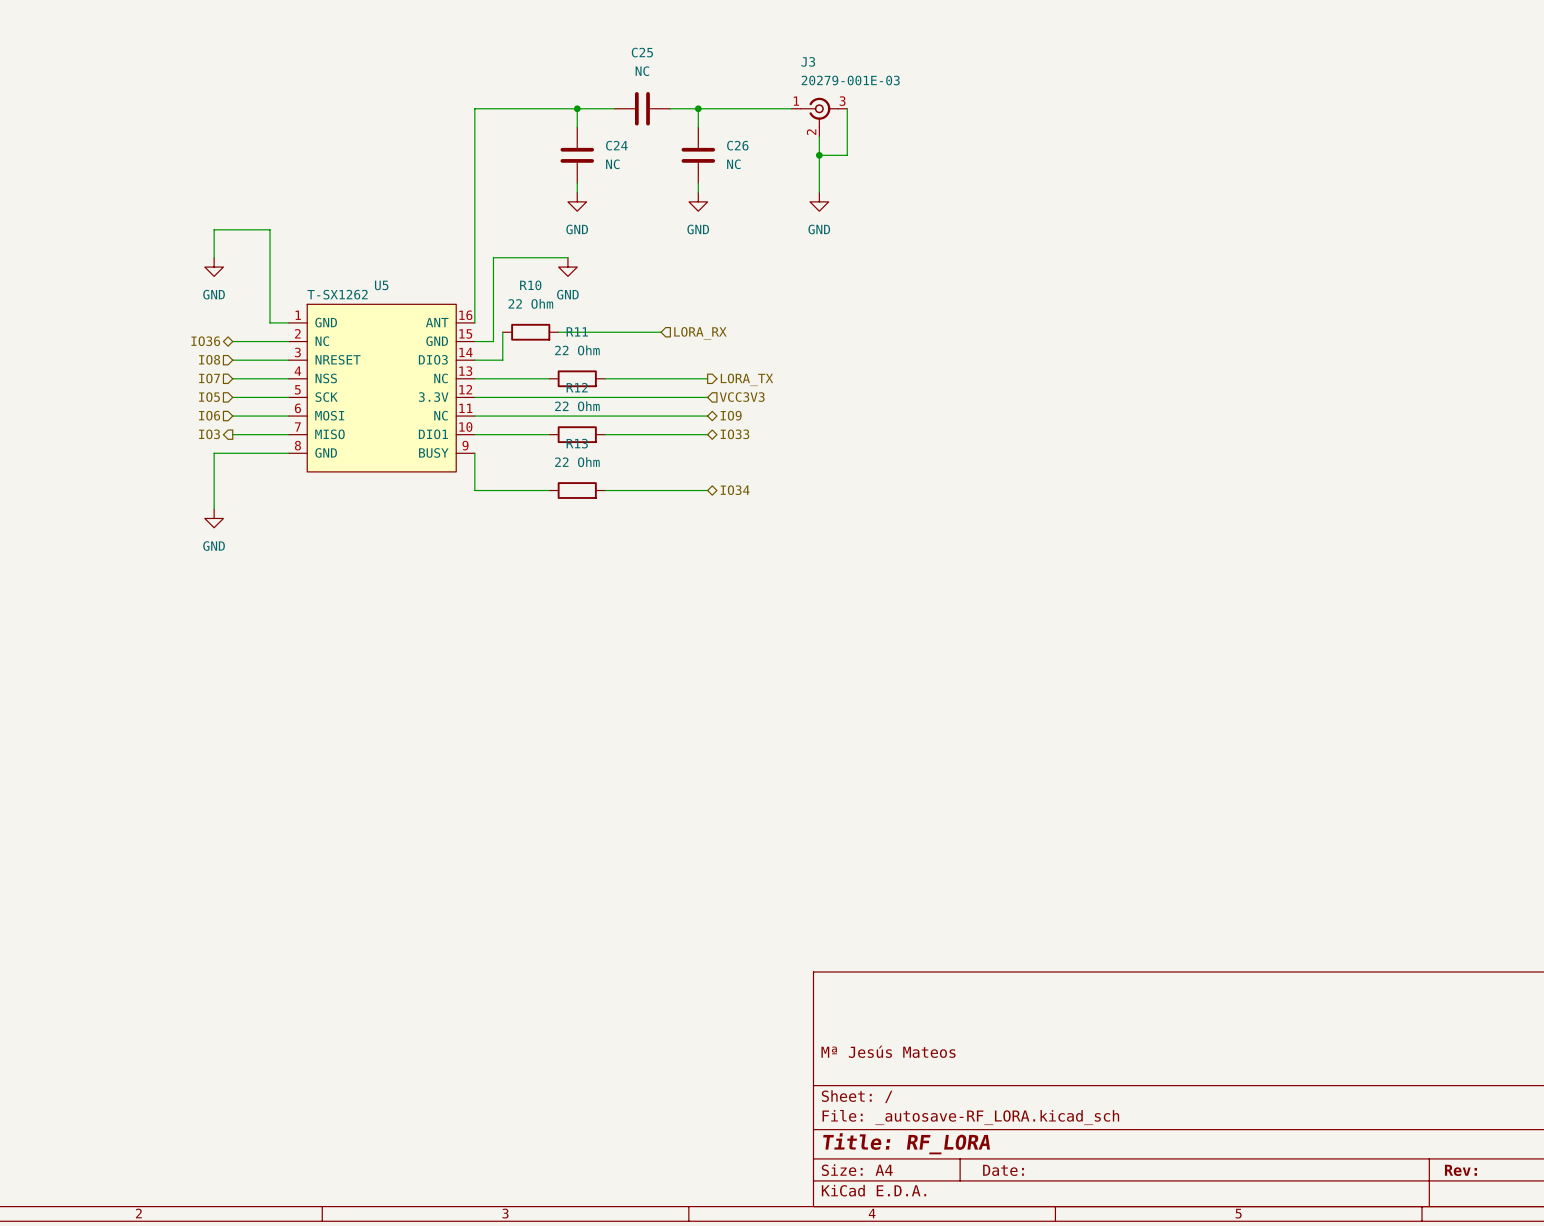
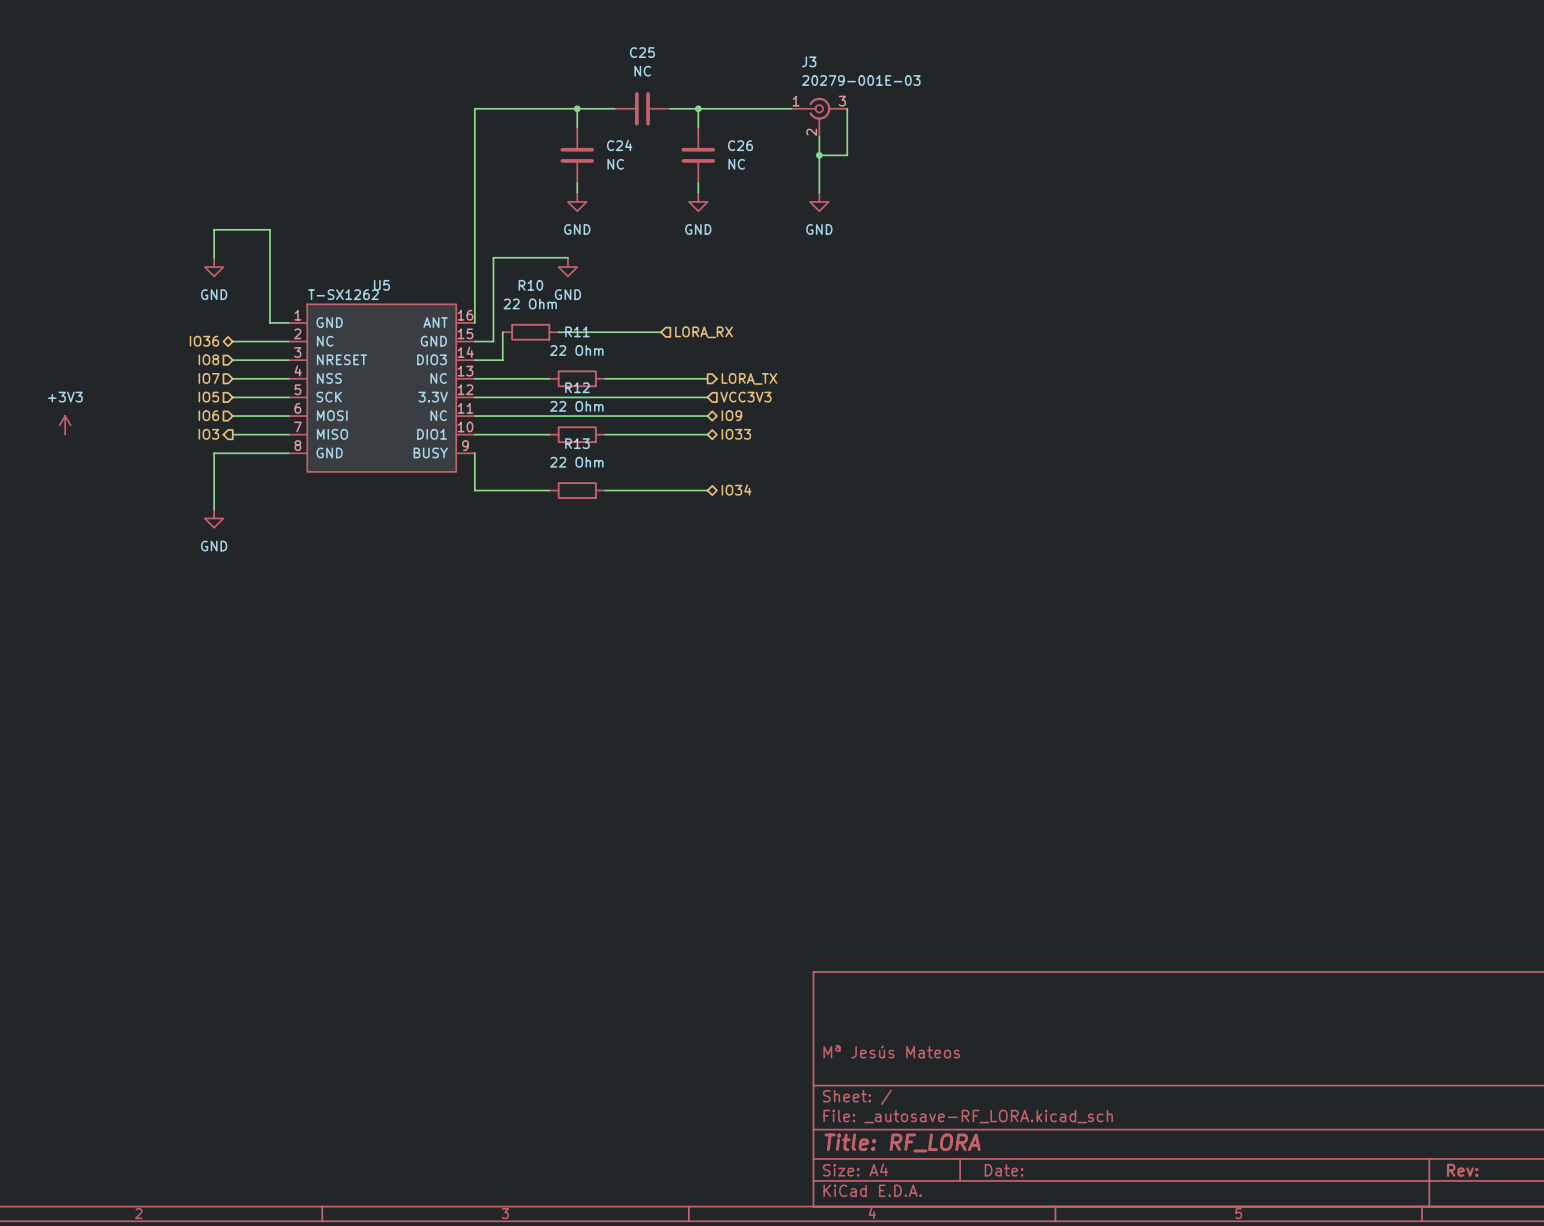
power symbol: none -> +3V3 (65, 425)

